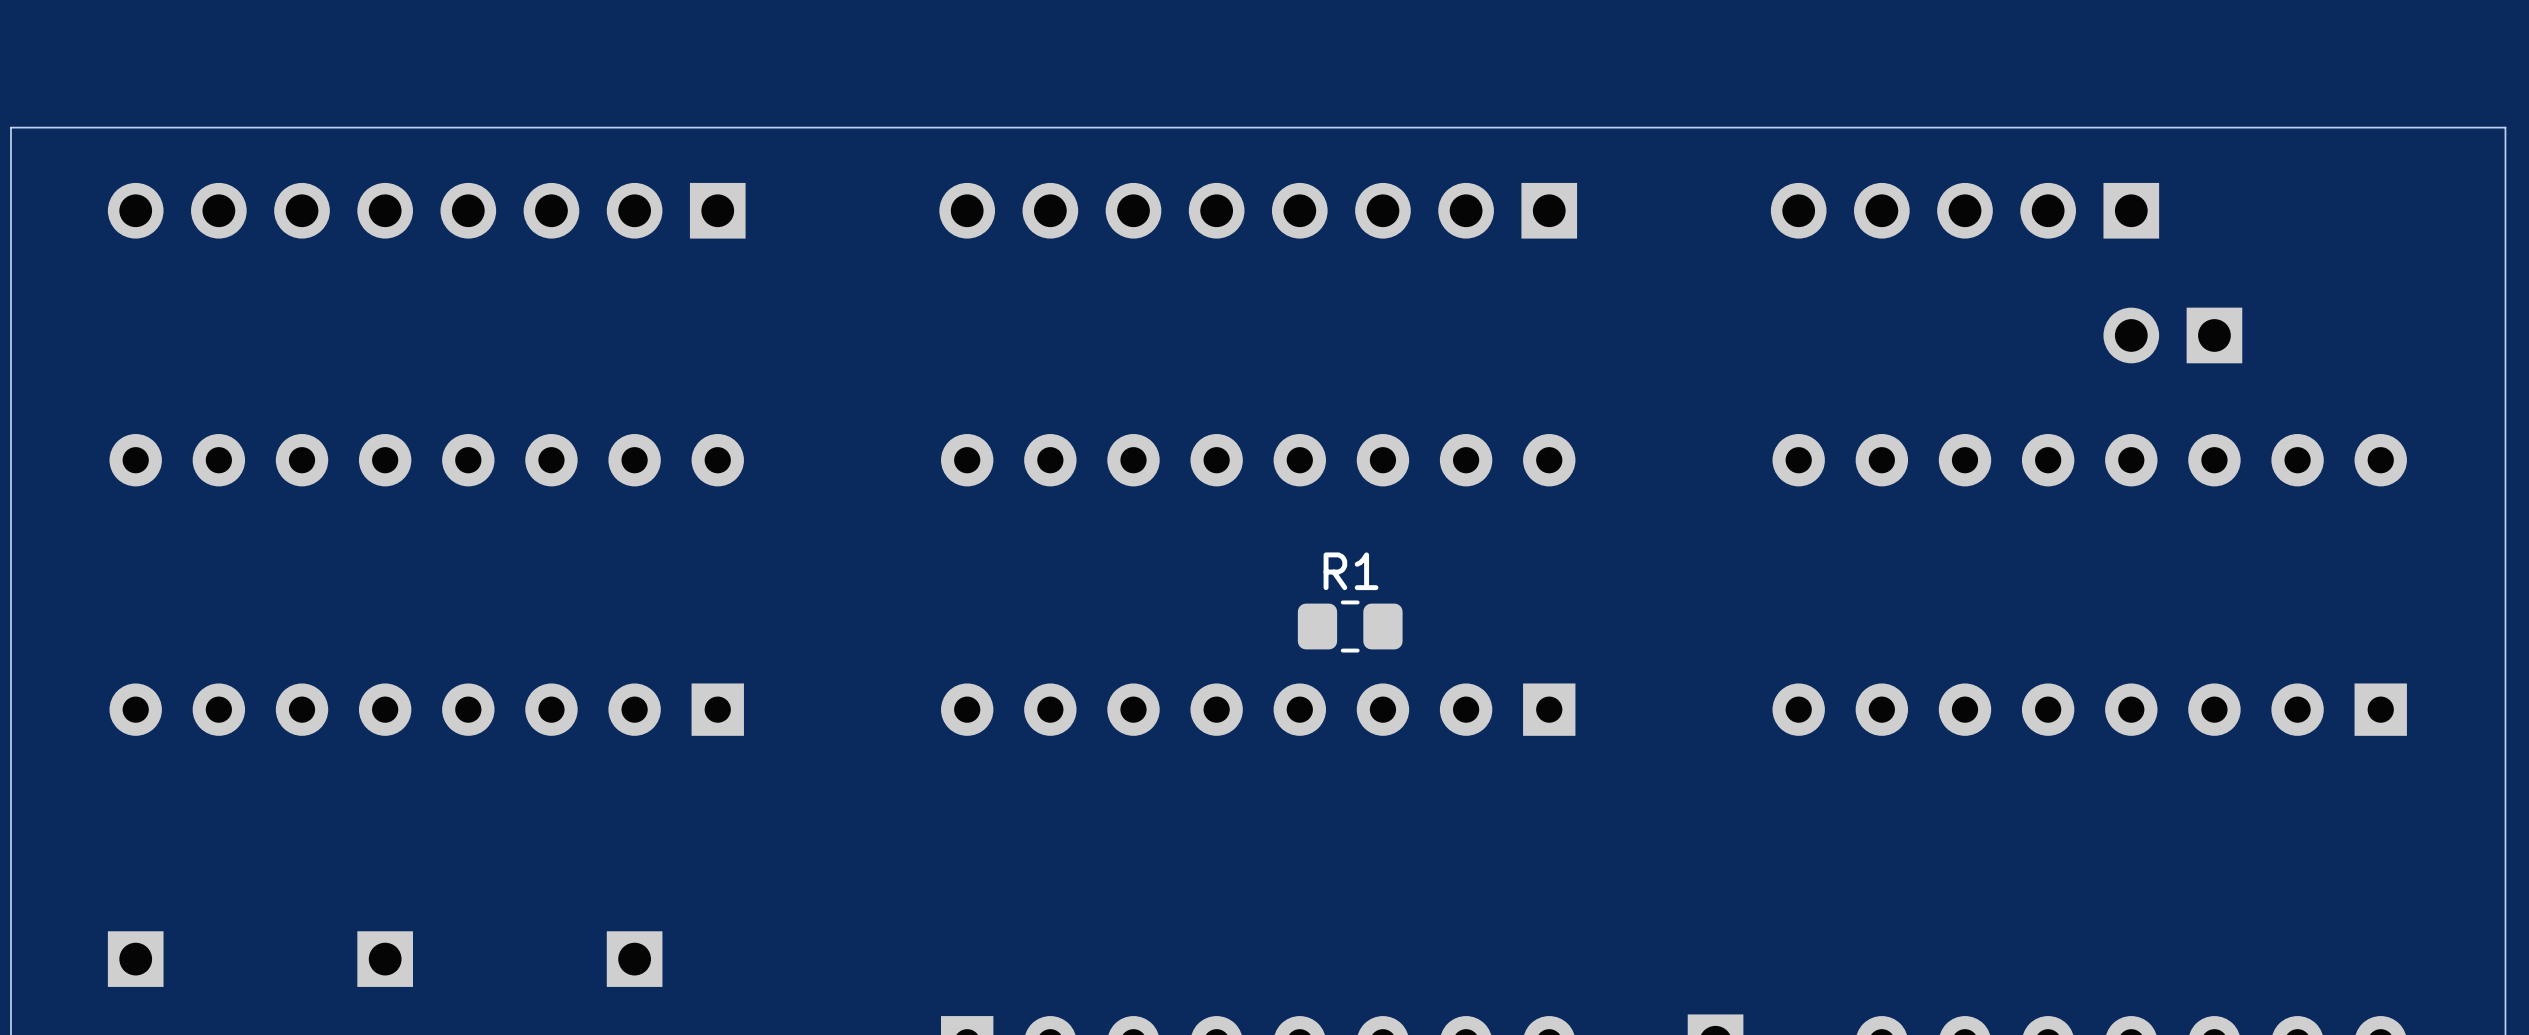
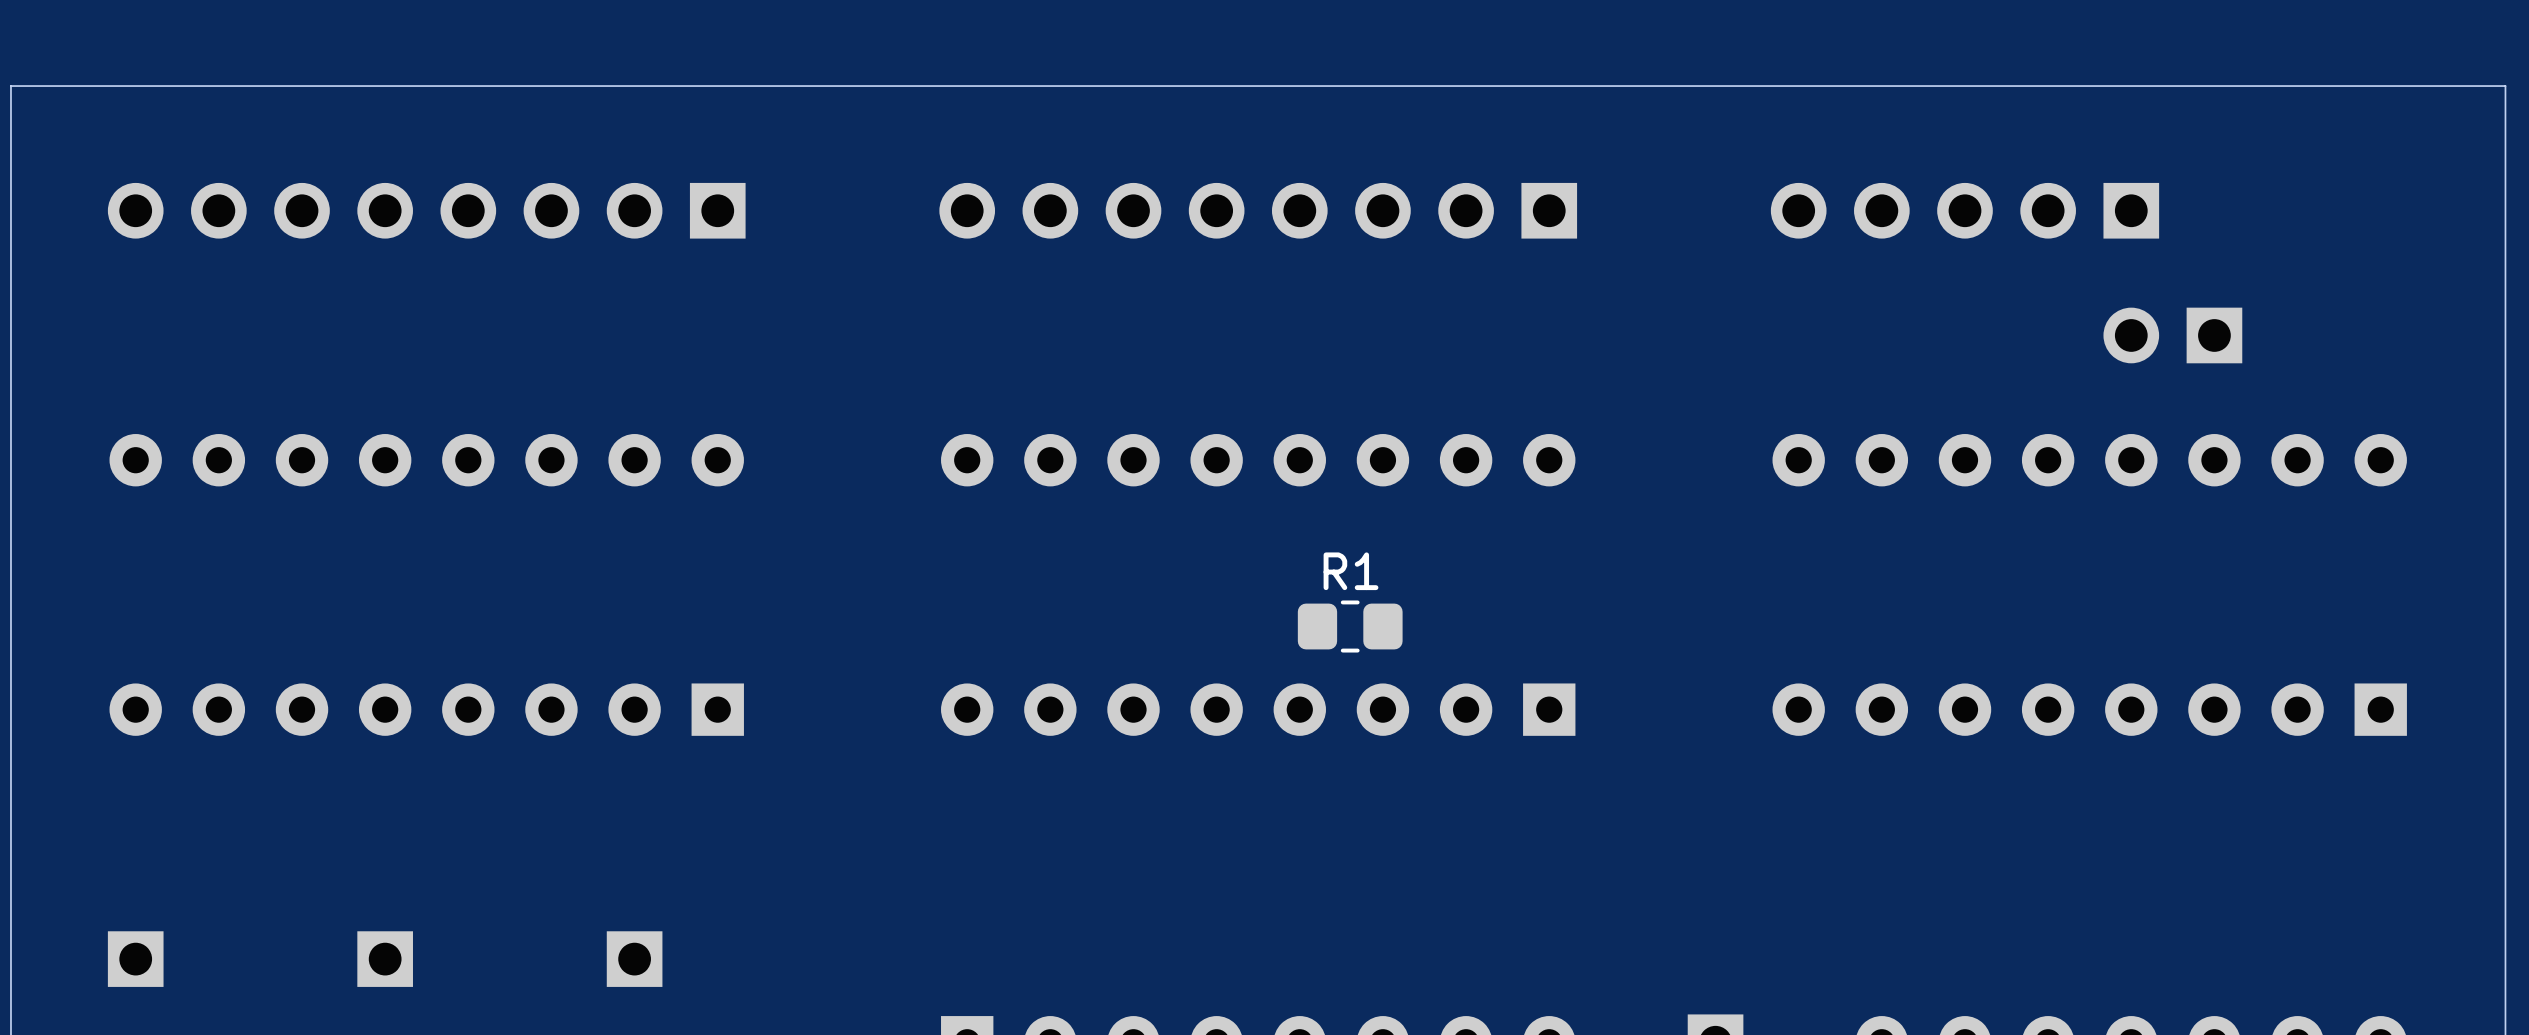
board edge: (2505, 127) (10, 127) -> (2505, 127) (2505, 86) (10, 86) (10, 127)

